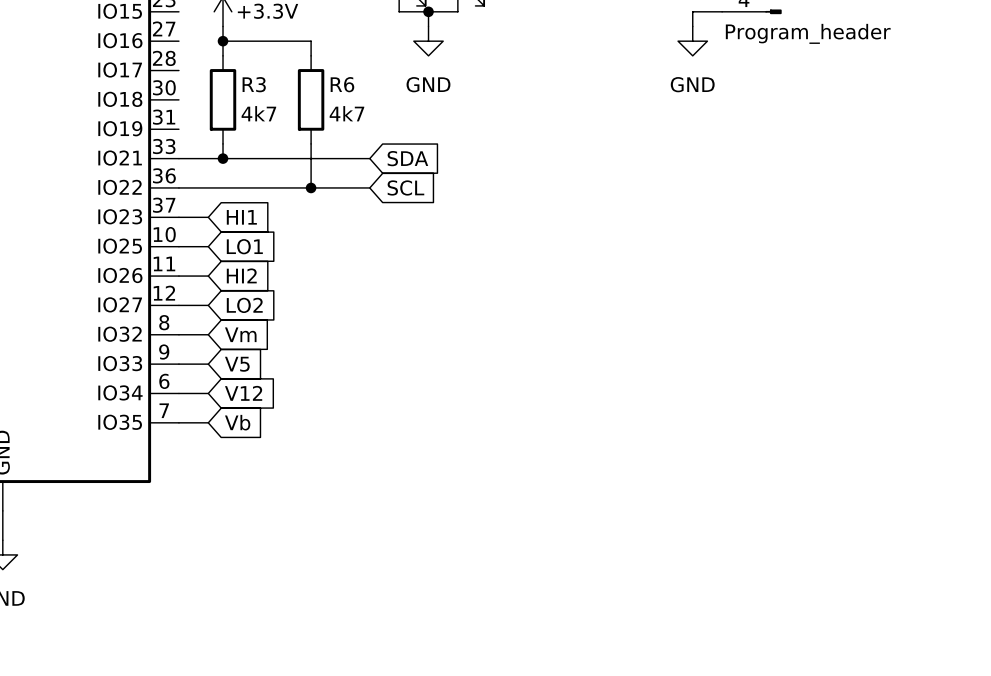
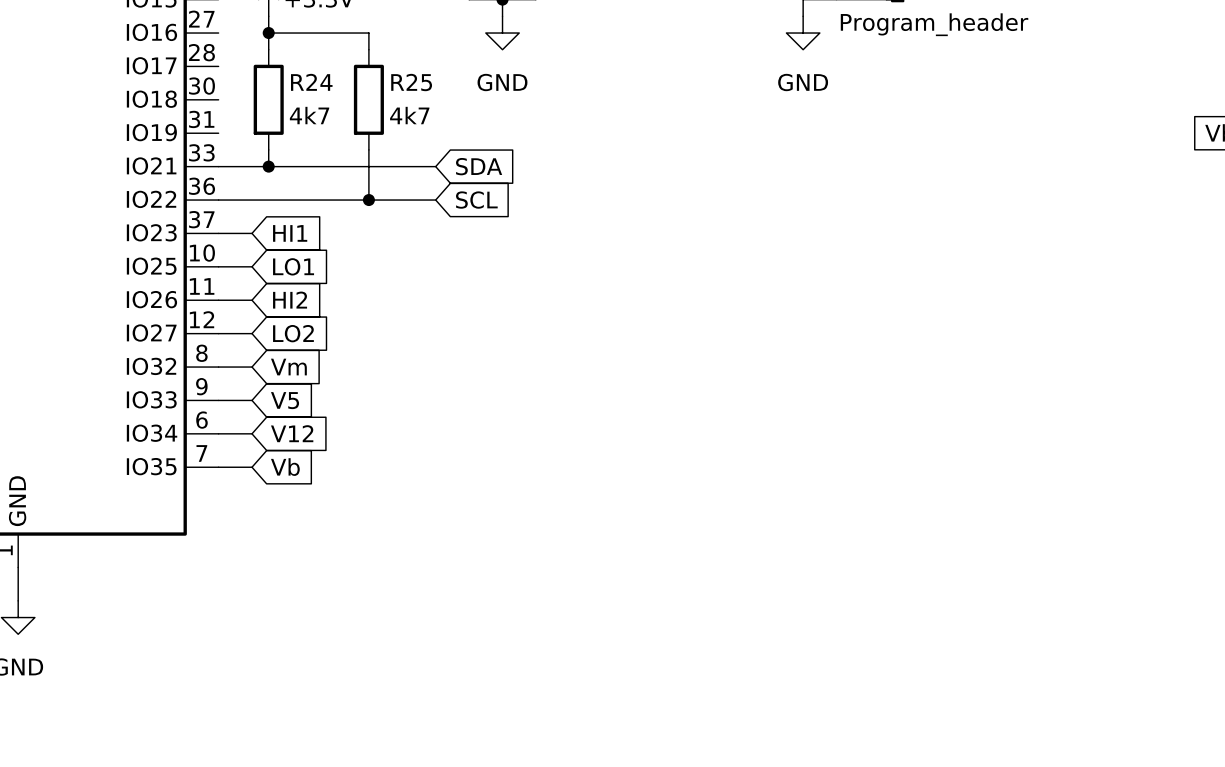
R3 name: R3 (254, 84) -> R24 (311, 82)
R6 name: R6 (342, 84) -> R25 (411, 82)

